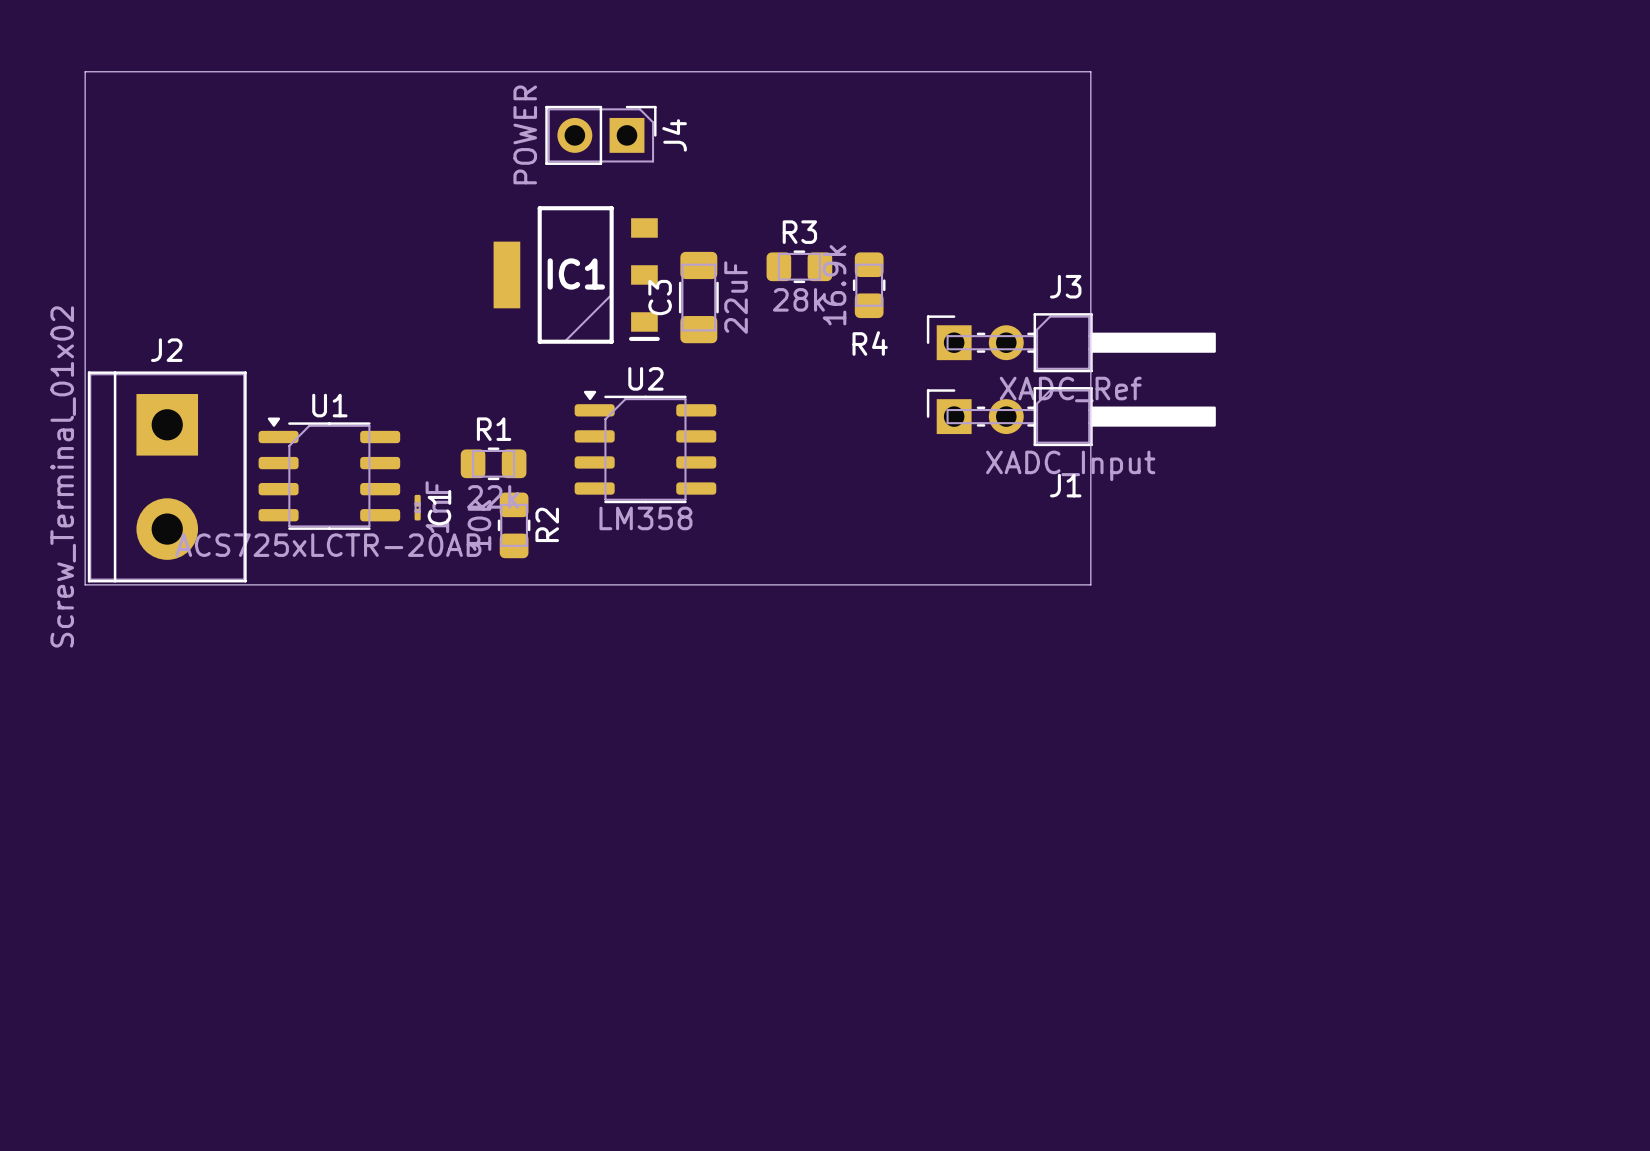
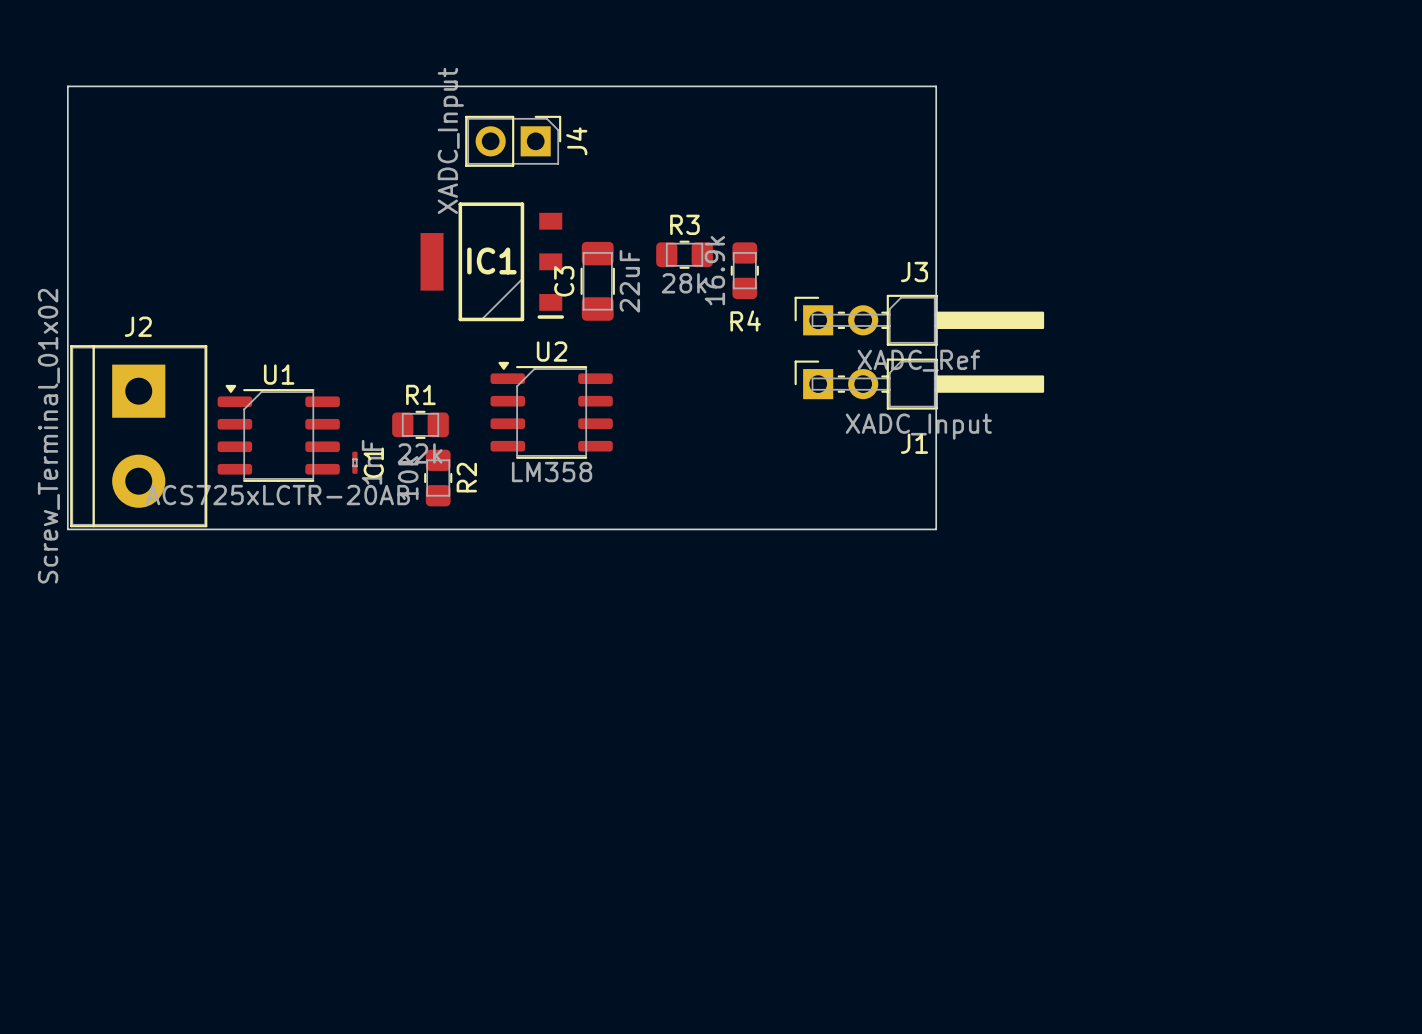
J4 value: POWER (525, 134) -> XADC_Input (450, 140)

